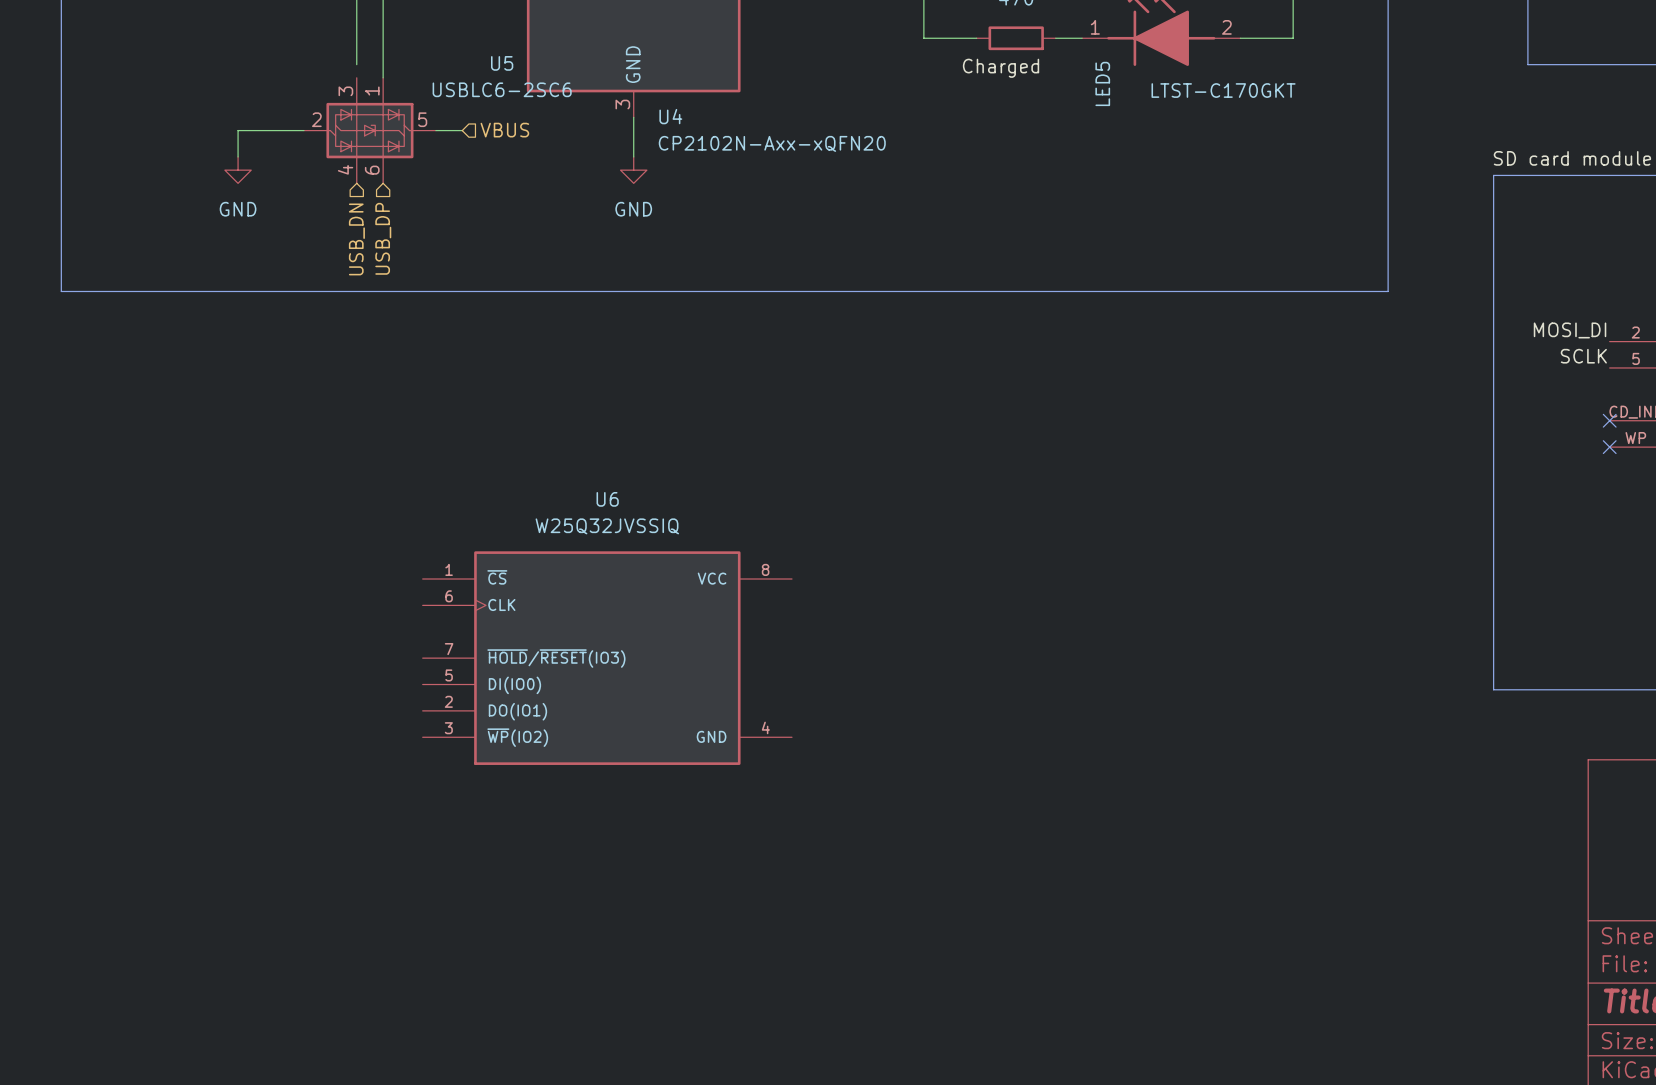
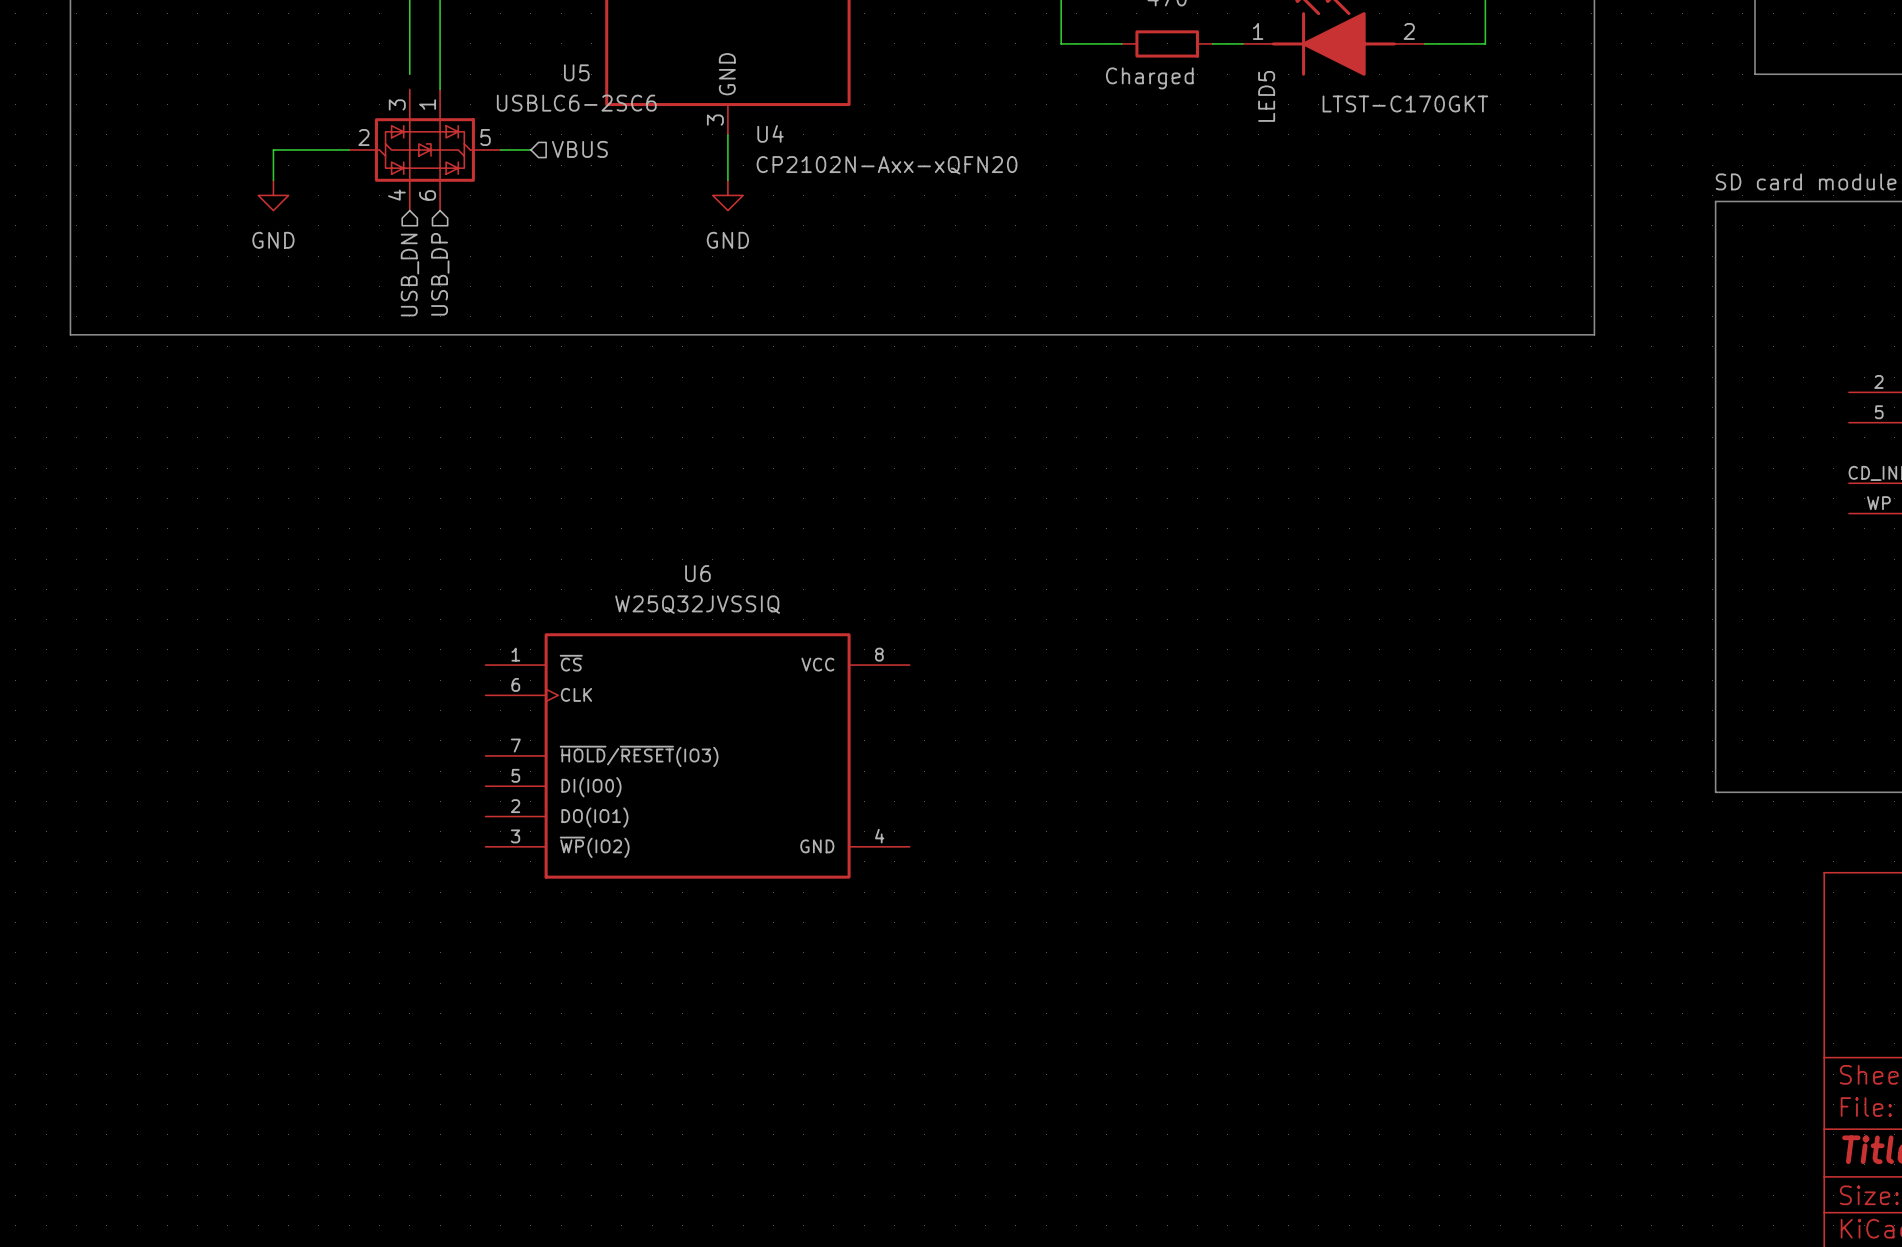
label: MOSI_DI (1570, 330) -> none
label: SCLK (1583, 356) -> none
no-connect mark: (1609, 420) -> none
no-connect mark: (1609, 447) -> none

